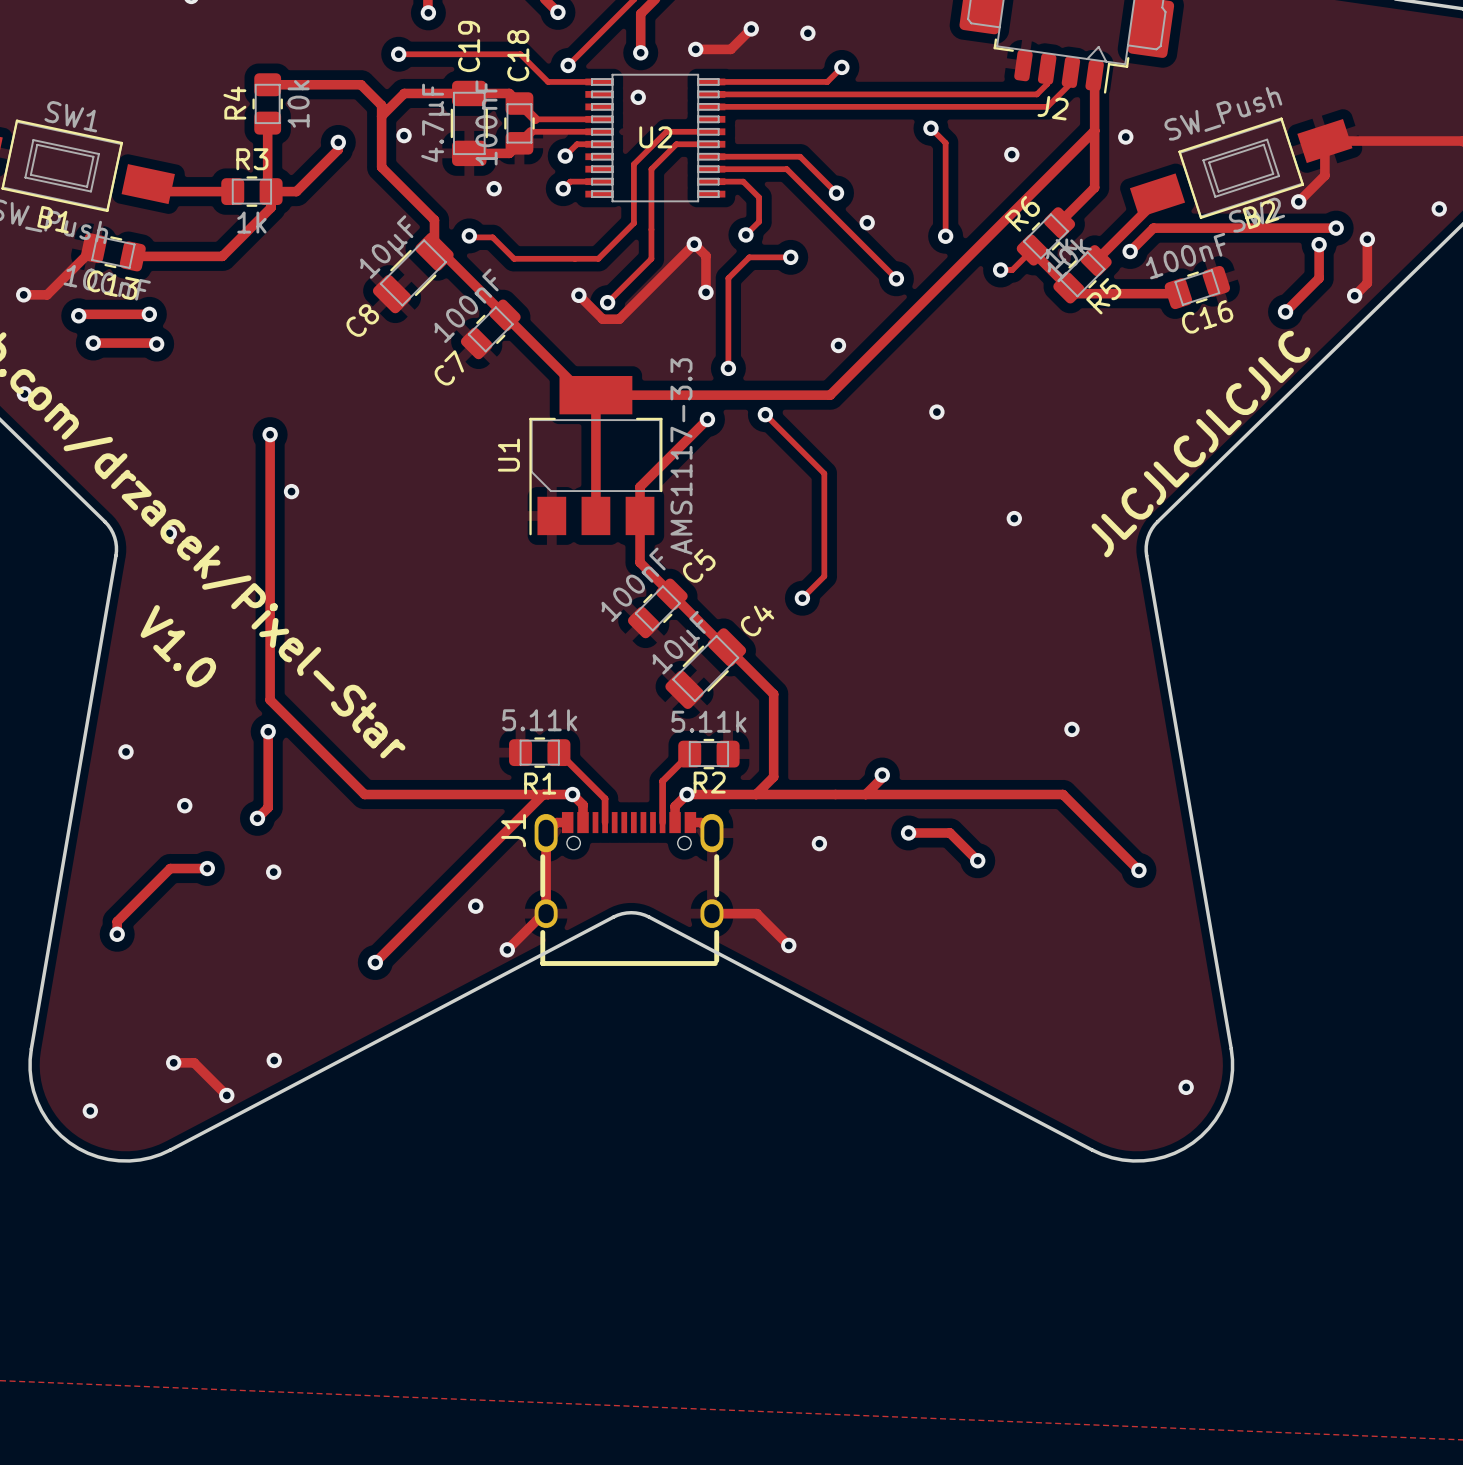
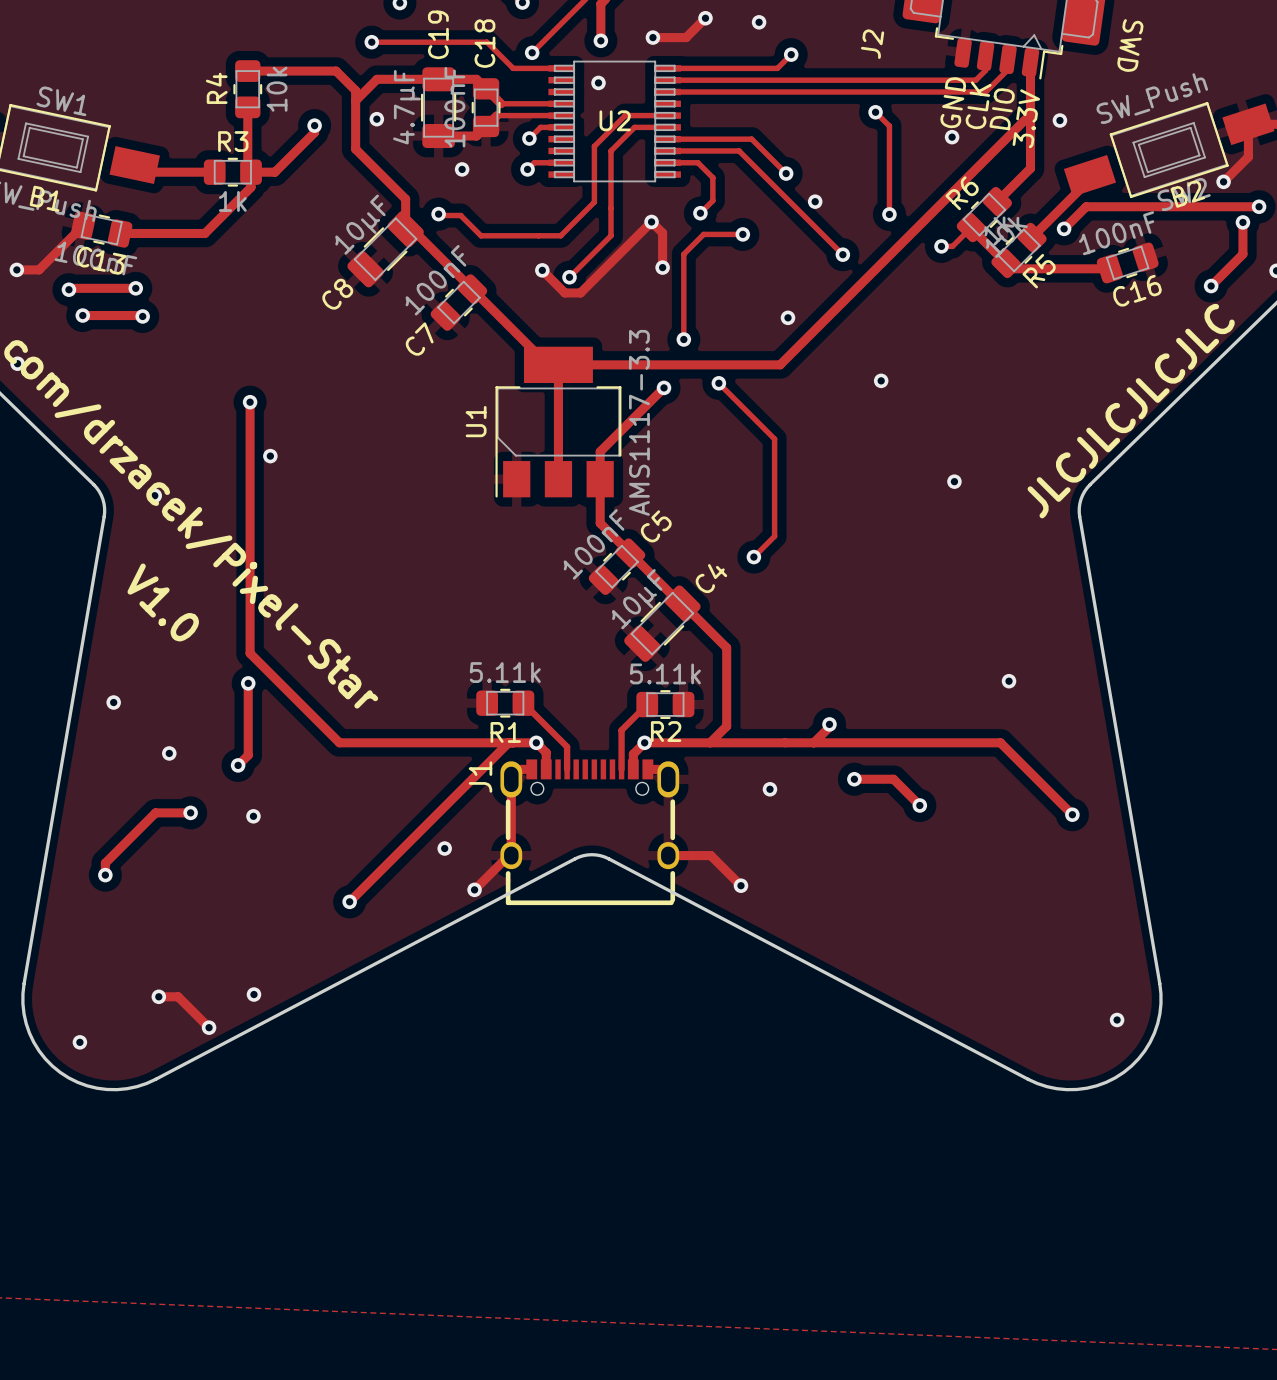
text: none -> SWD (1130, 45)
J2 name rotation: 0° (1053, 108) -> 90° counterclockwise (872, 44)
J2 name position: J2 (1053, 108) -> J2 (872, 44)
text: none -> GND (953, 102)
text: none -> CLK (978, 105)
text: none -> DIO (1002, 109)
text: none -> 3.3V (1026, 118)

